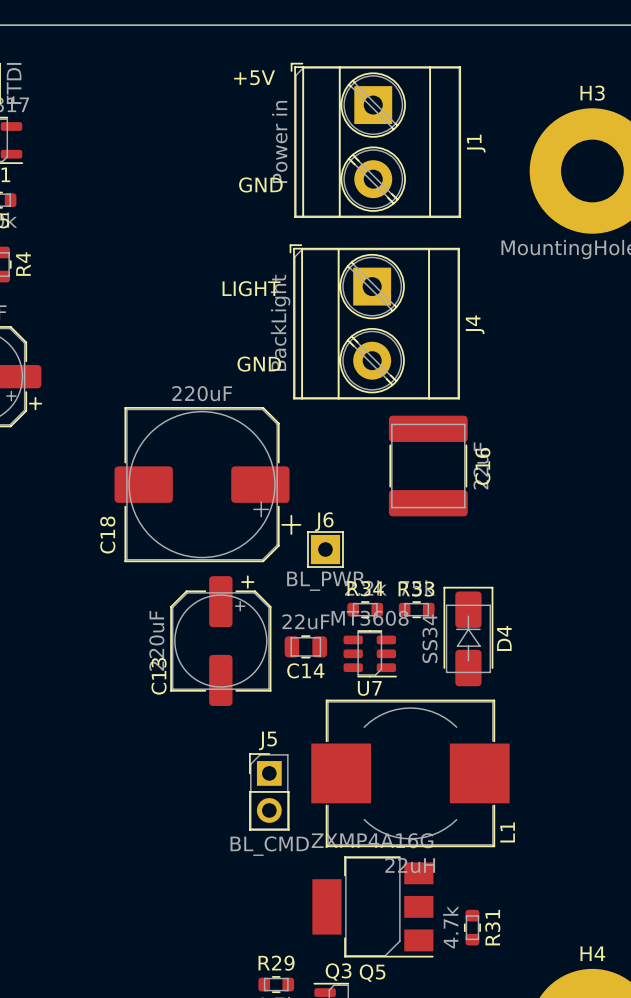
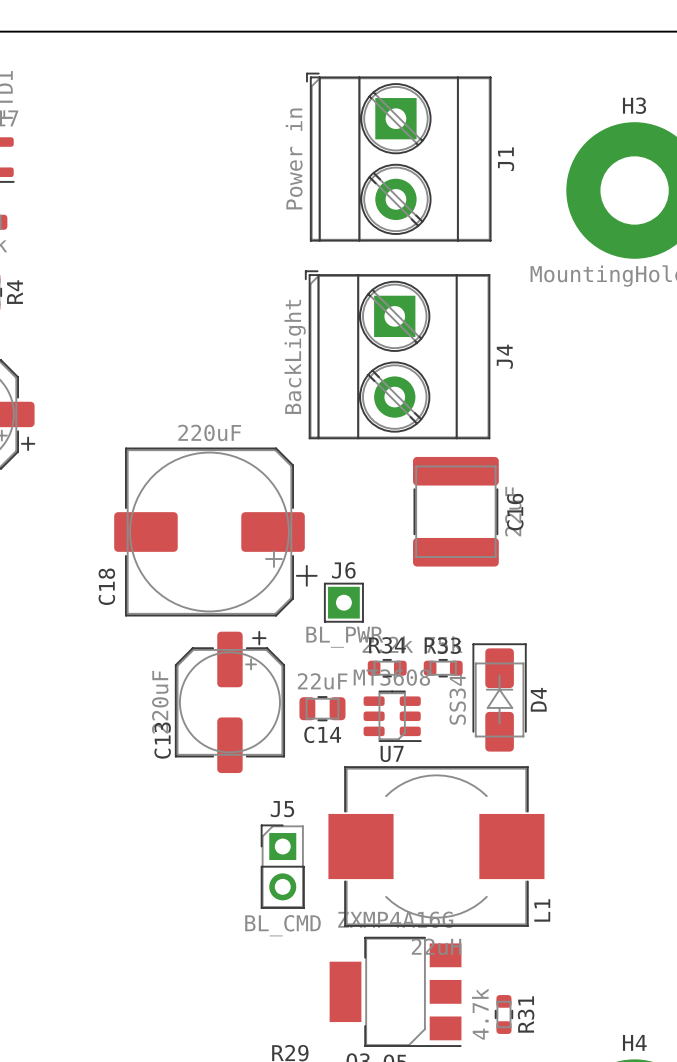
text: +5V (254, 77) -> none
text: GND (260, 184) -> none
text: LIGHT (251, 288) -> none
text: GND (259, 364) -> none

